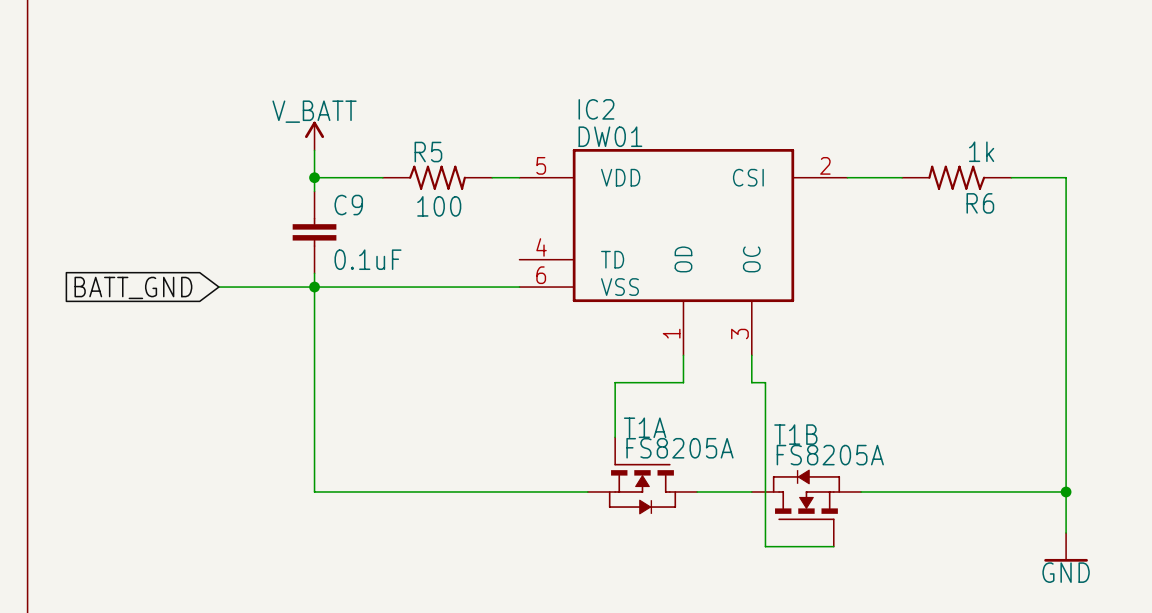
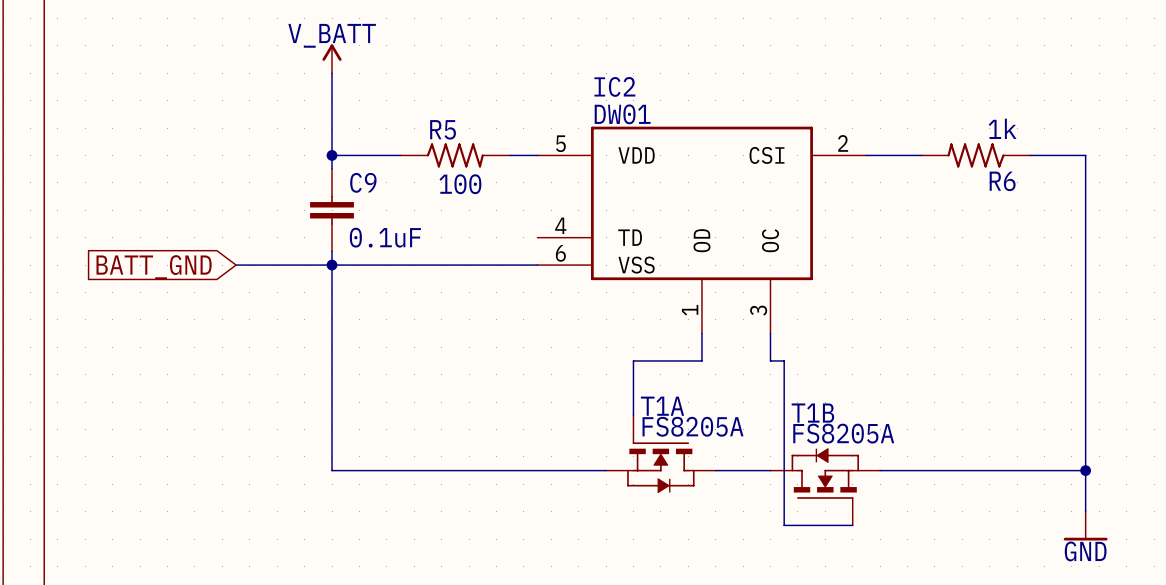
power symbol position: V_BATT (314, 136) -> V_BATT (332, 58)

